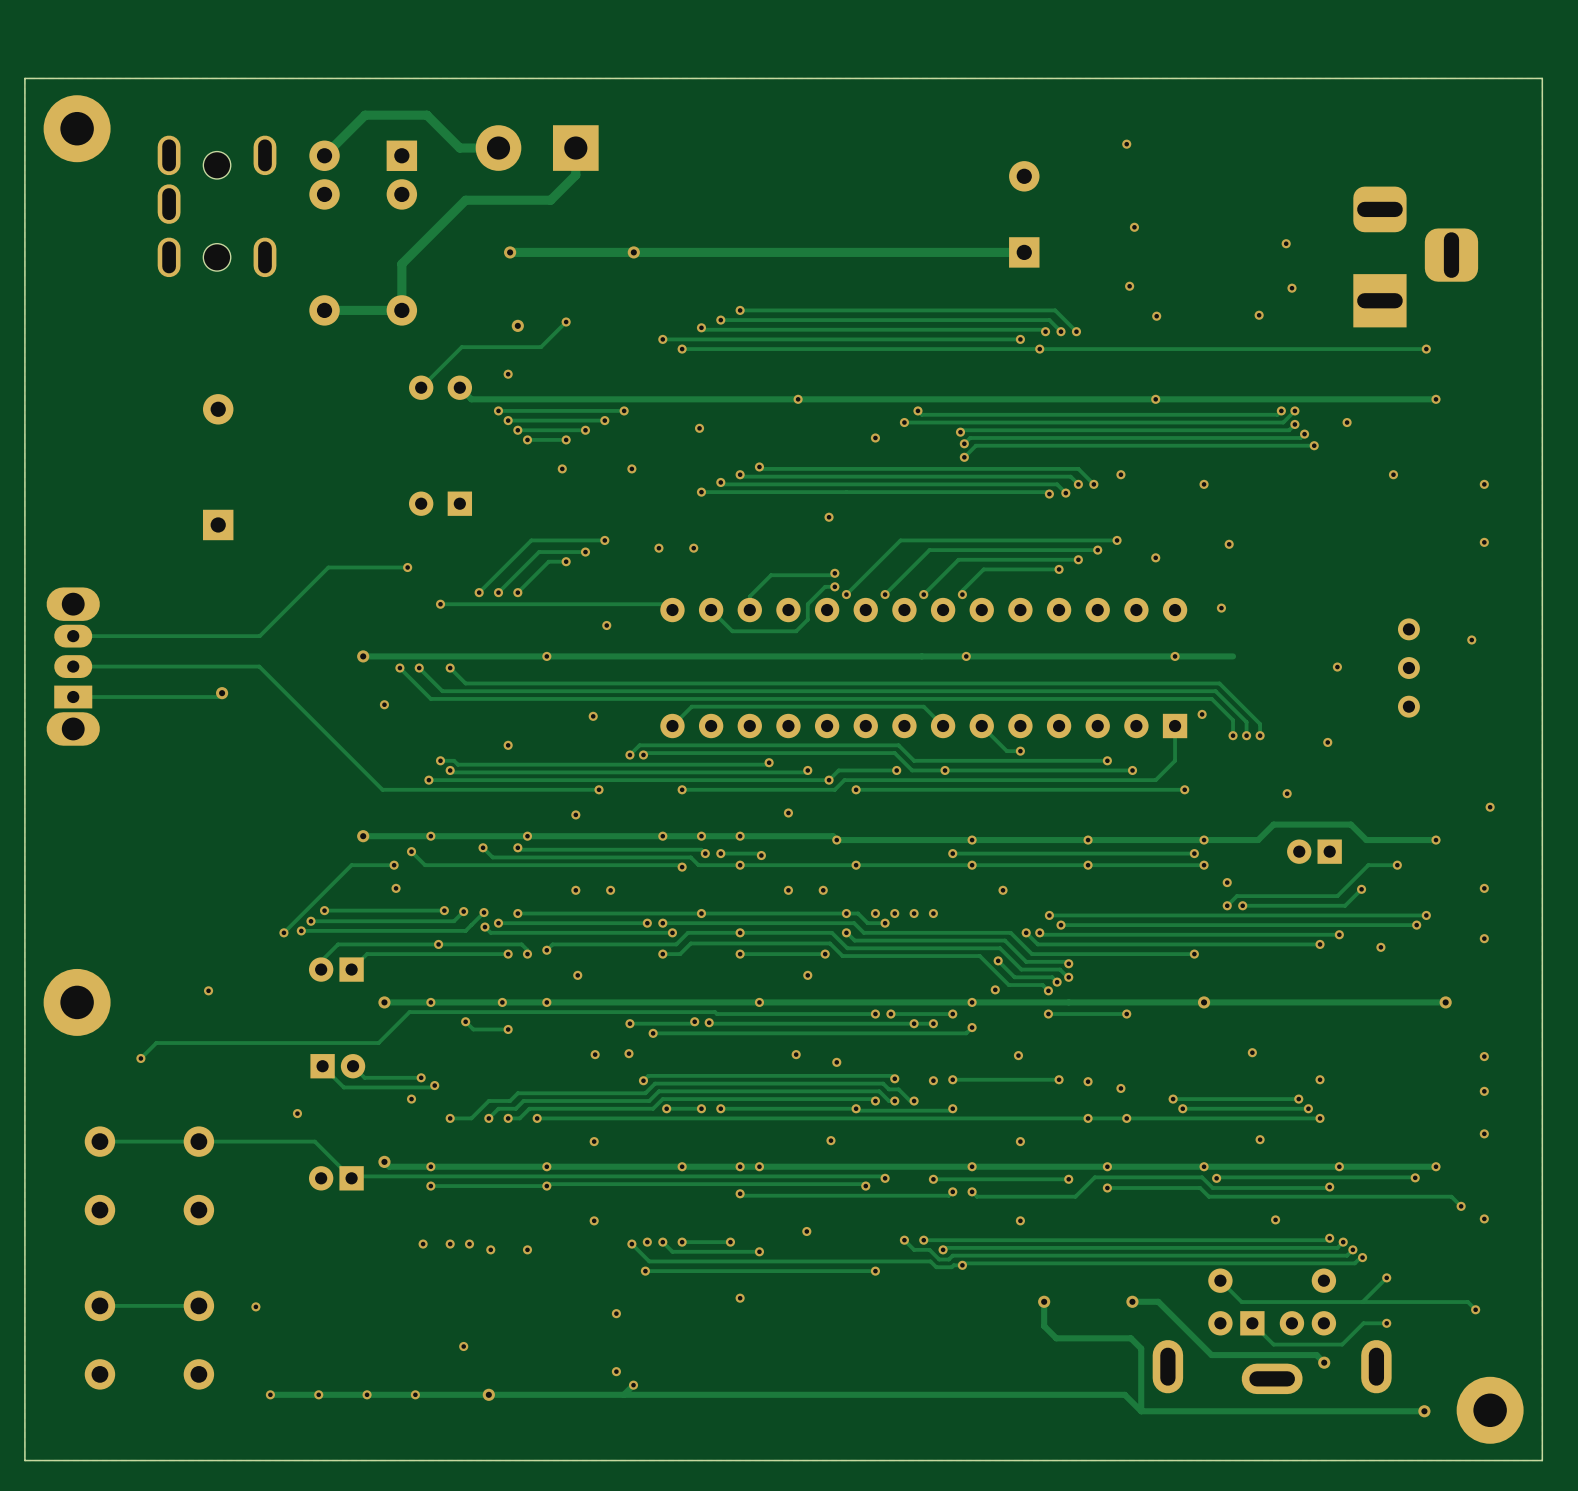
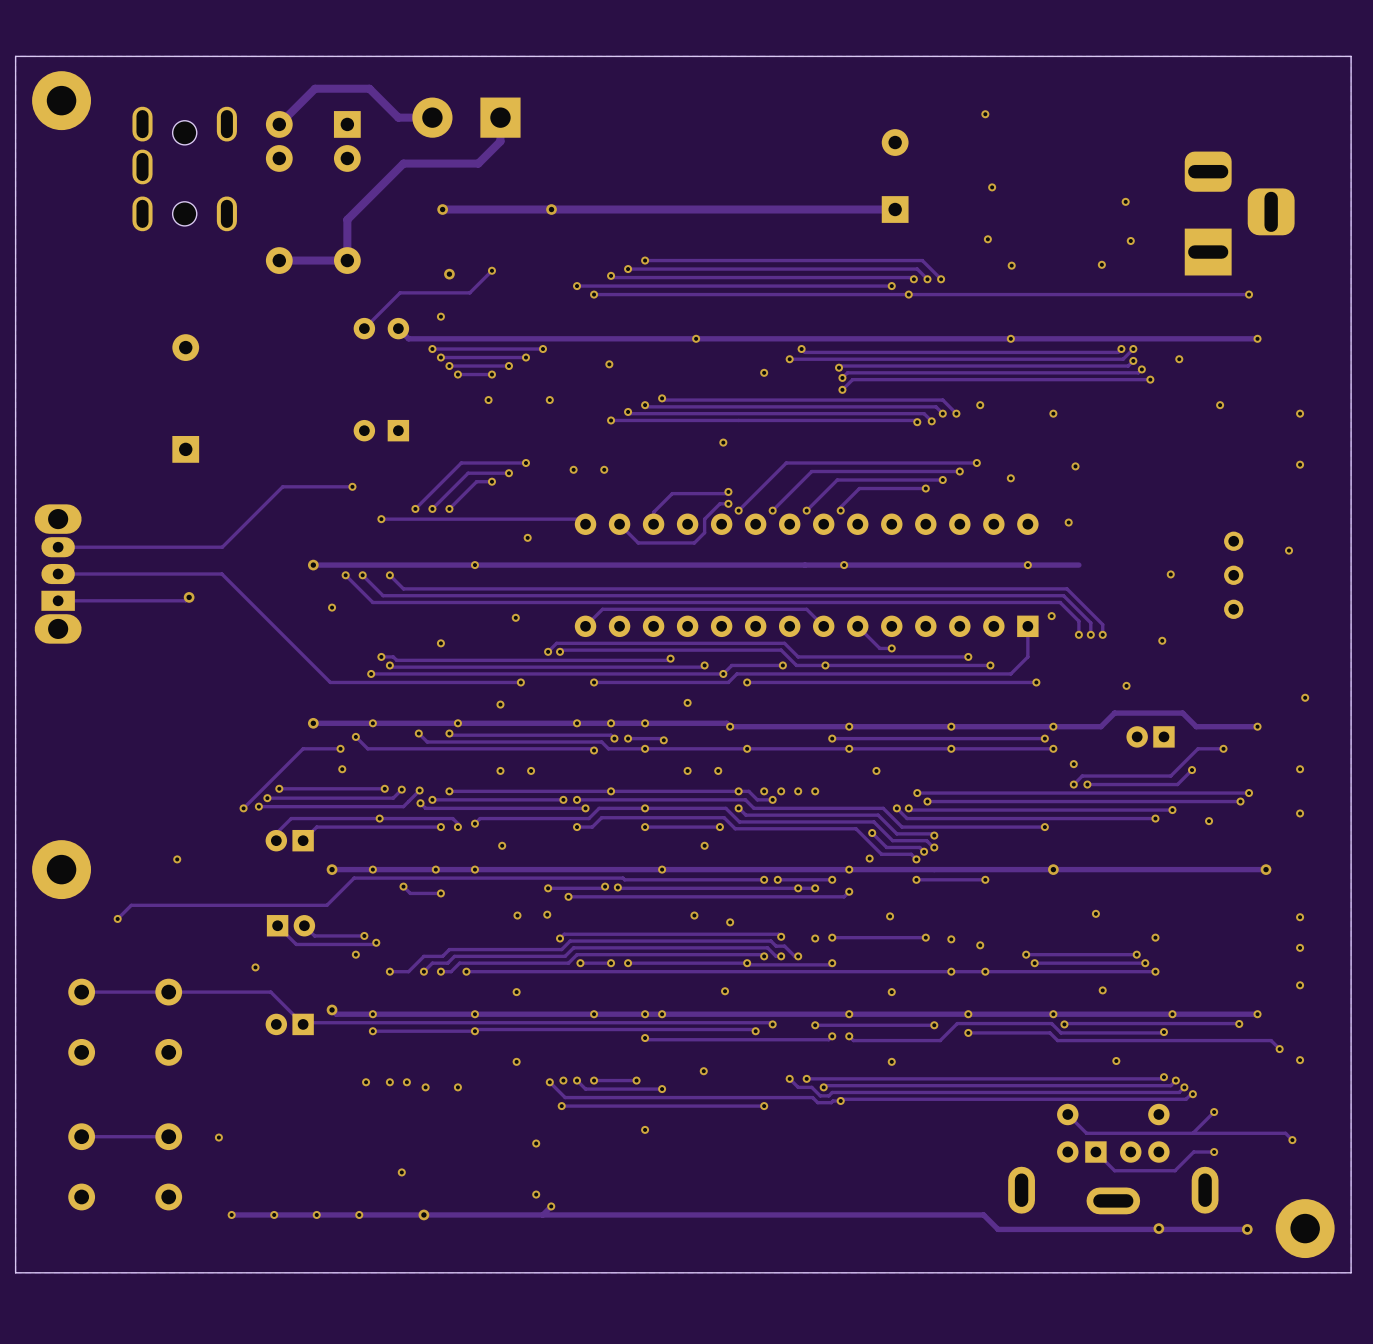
track: (1044, 1301) (1044, 1326) (1056, 1338) (1130, 1338) (1141, 1348) (1141, 1411) -> none
via: (1044, 1301) -> none
track: (1132, 1301) (1158, 1301) (1211, 1355) (1316, 1355) (1324, 1362) -> none
via: (1132, 1301) -> none
via position: (1324, 1362) -> (1158, 1228)

